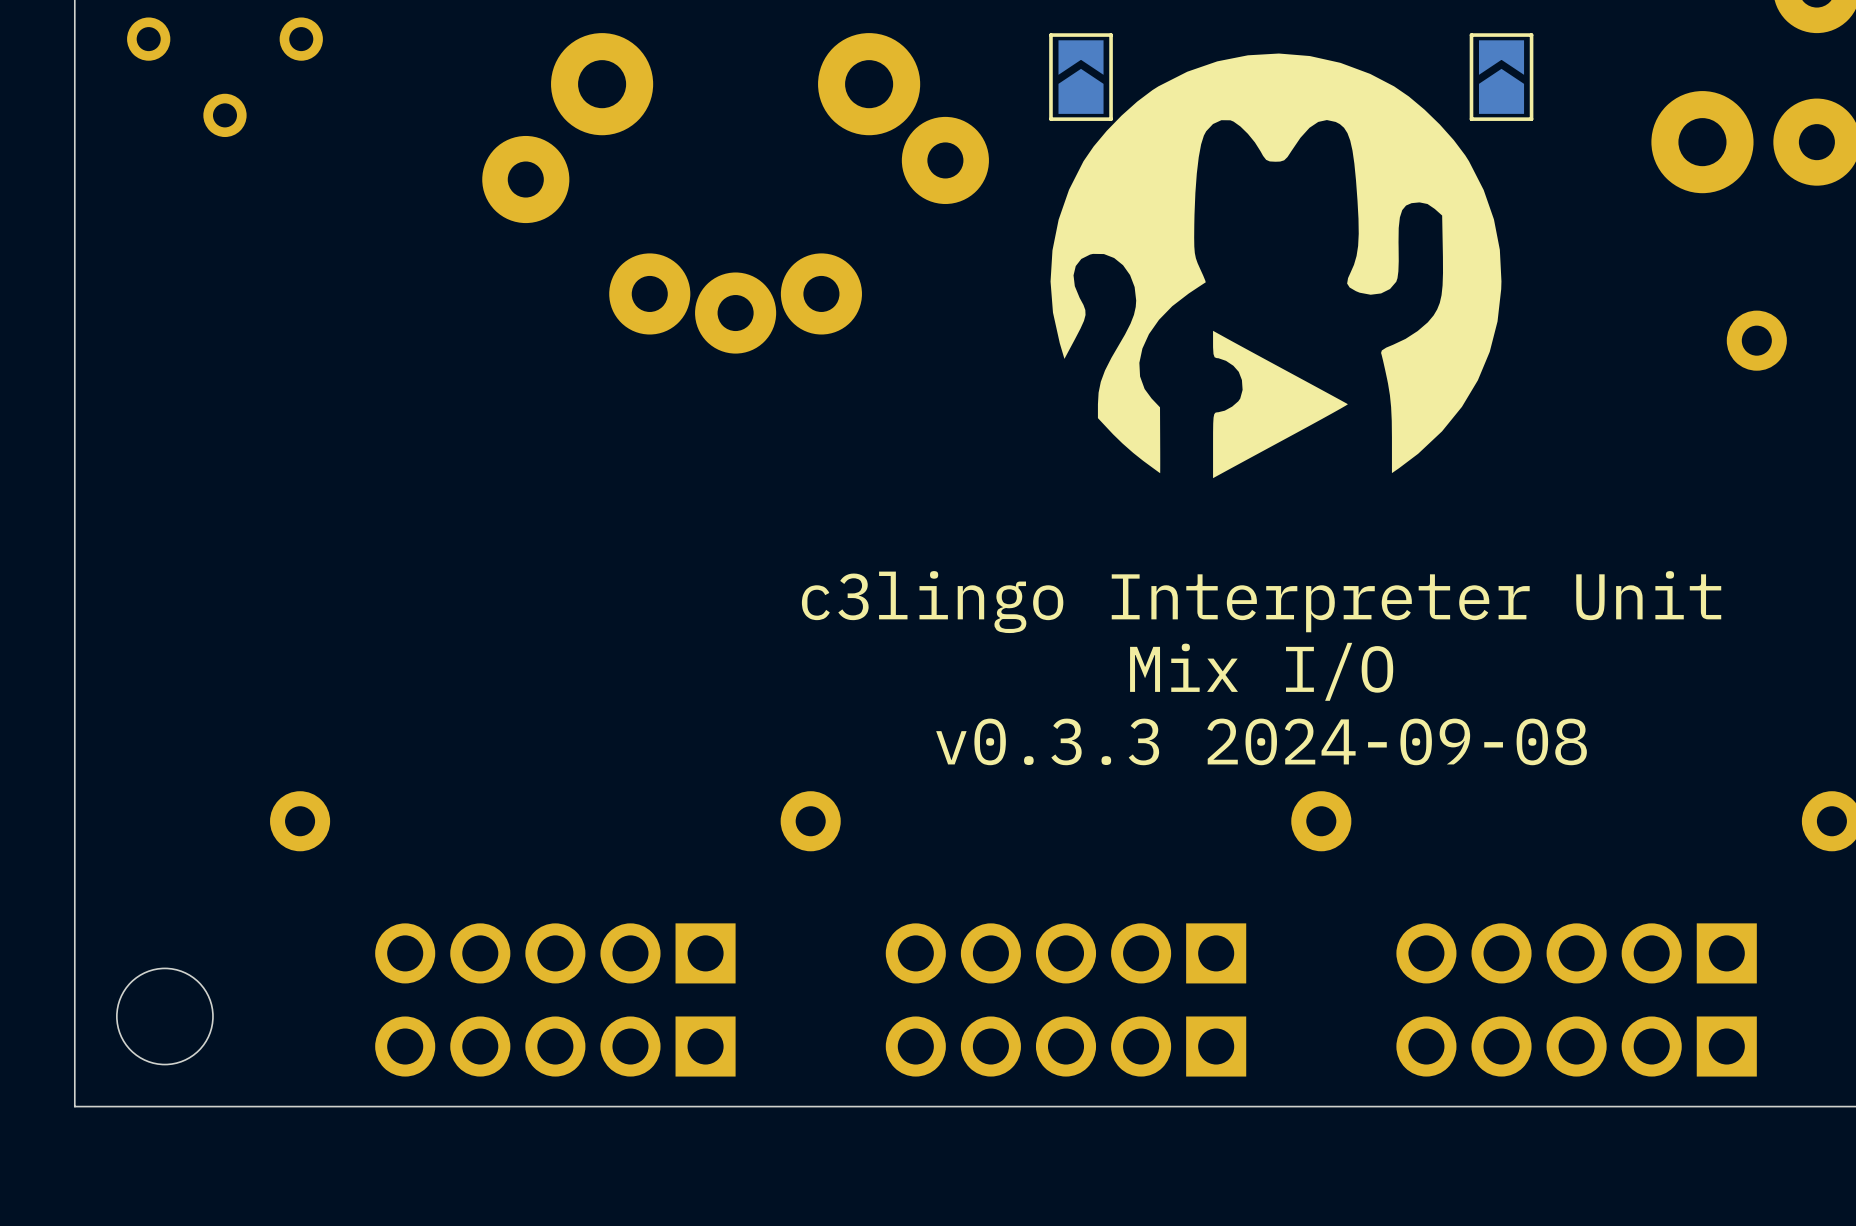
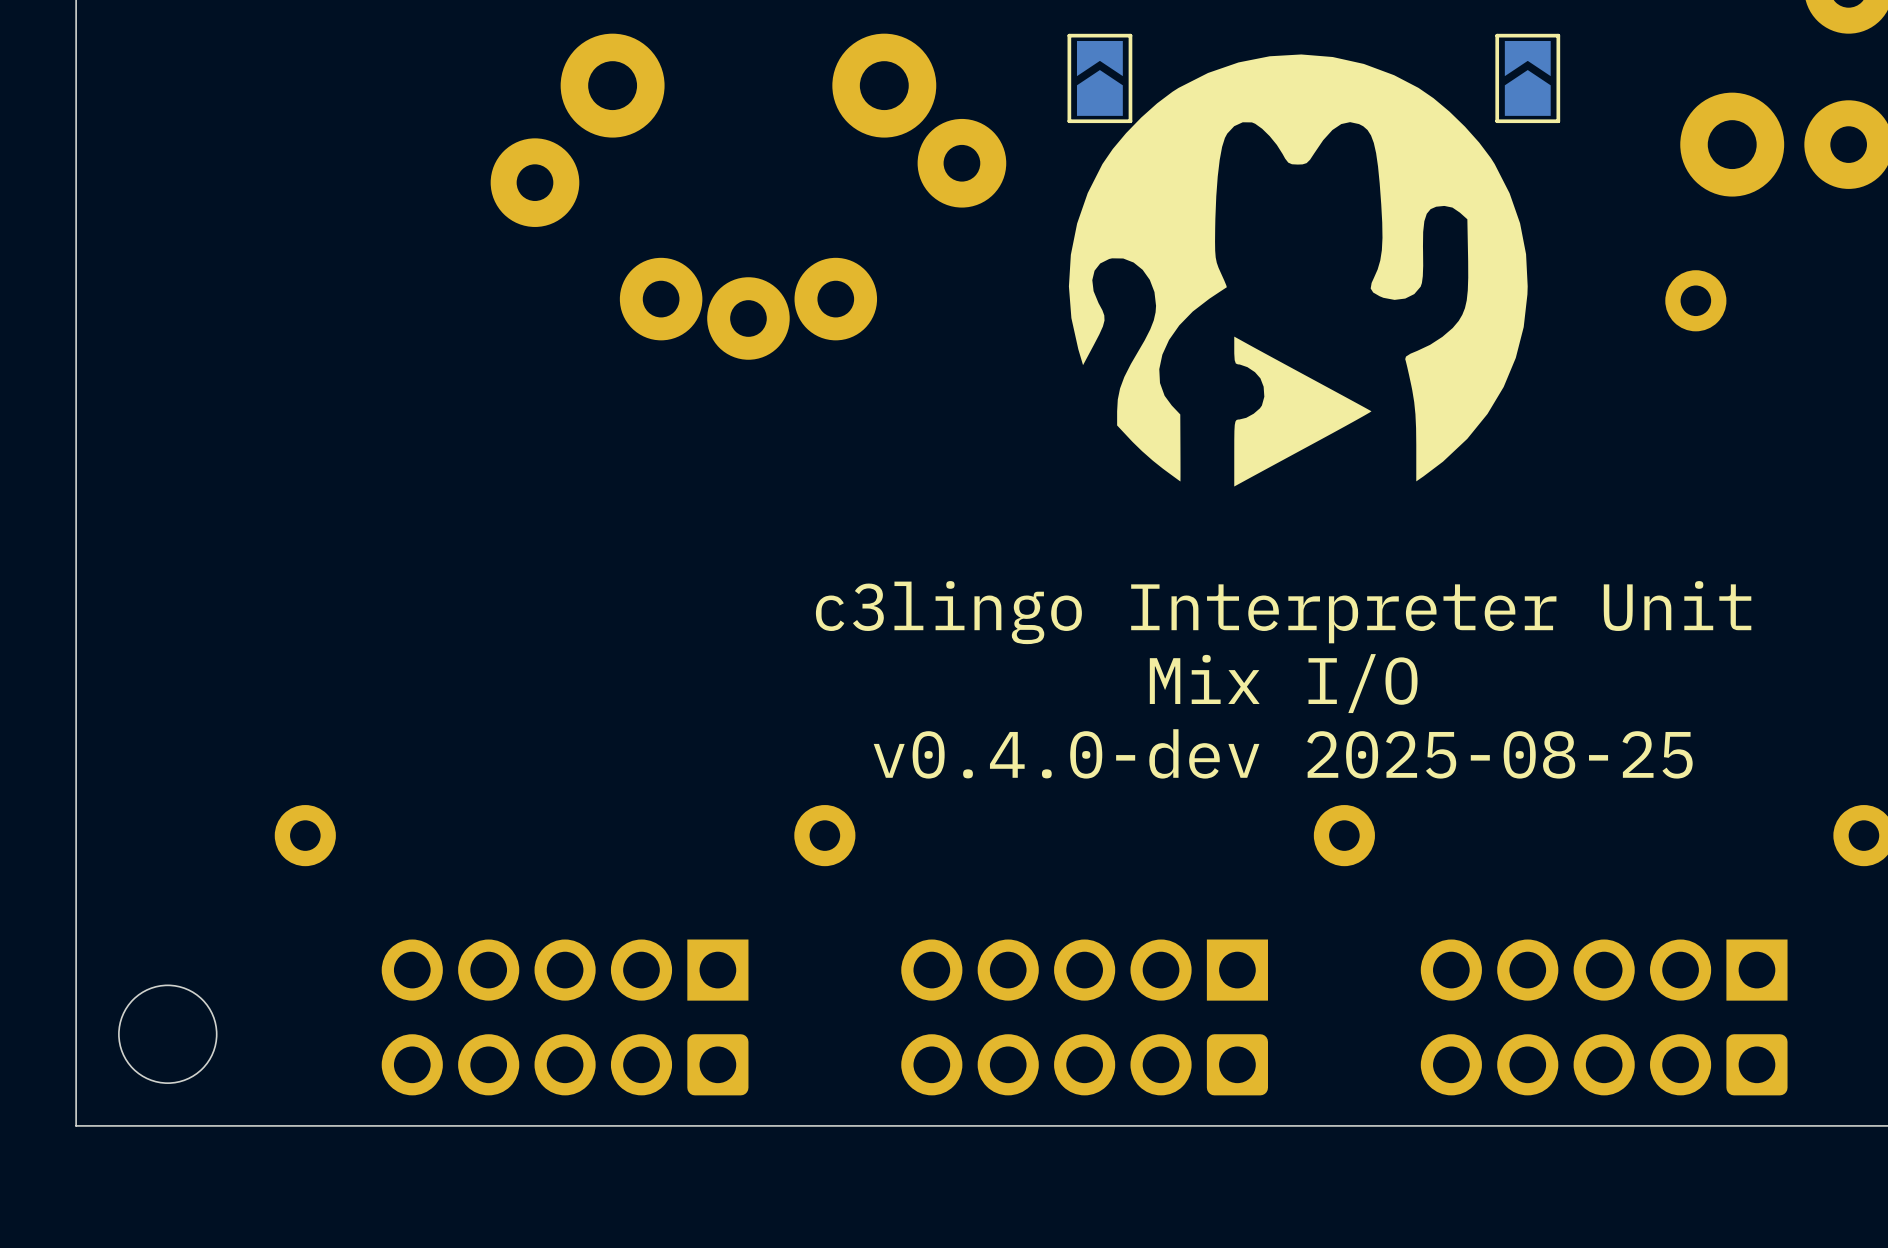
part: (224, 77) -> none
part position: (1756, 340) -> (1695, 300)
text: v0.3.3 2024-09-08 (1261, 741) -> v0.4.0-dev 2025-08-25 (1283, 753)
part footprint: [375, 923, 736, 1077] -> [381, 939, 749, 1096]
part footprint: [885, 923, 1247, 1077] -> [901, 939, 1268, 1096]
part footprint: [1396, 923, 1757, 1077] -> [1420, 939, 1788, 1096]

